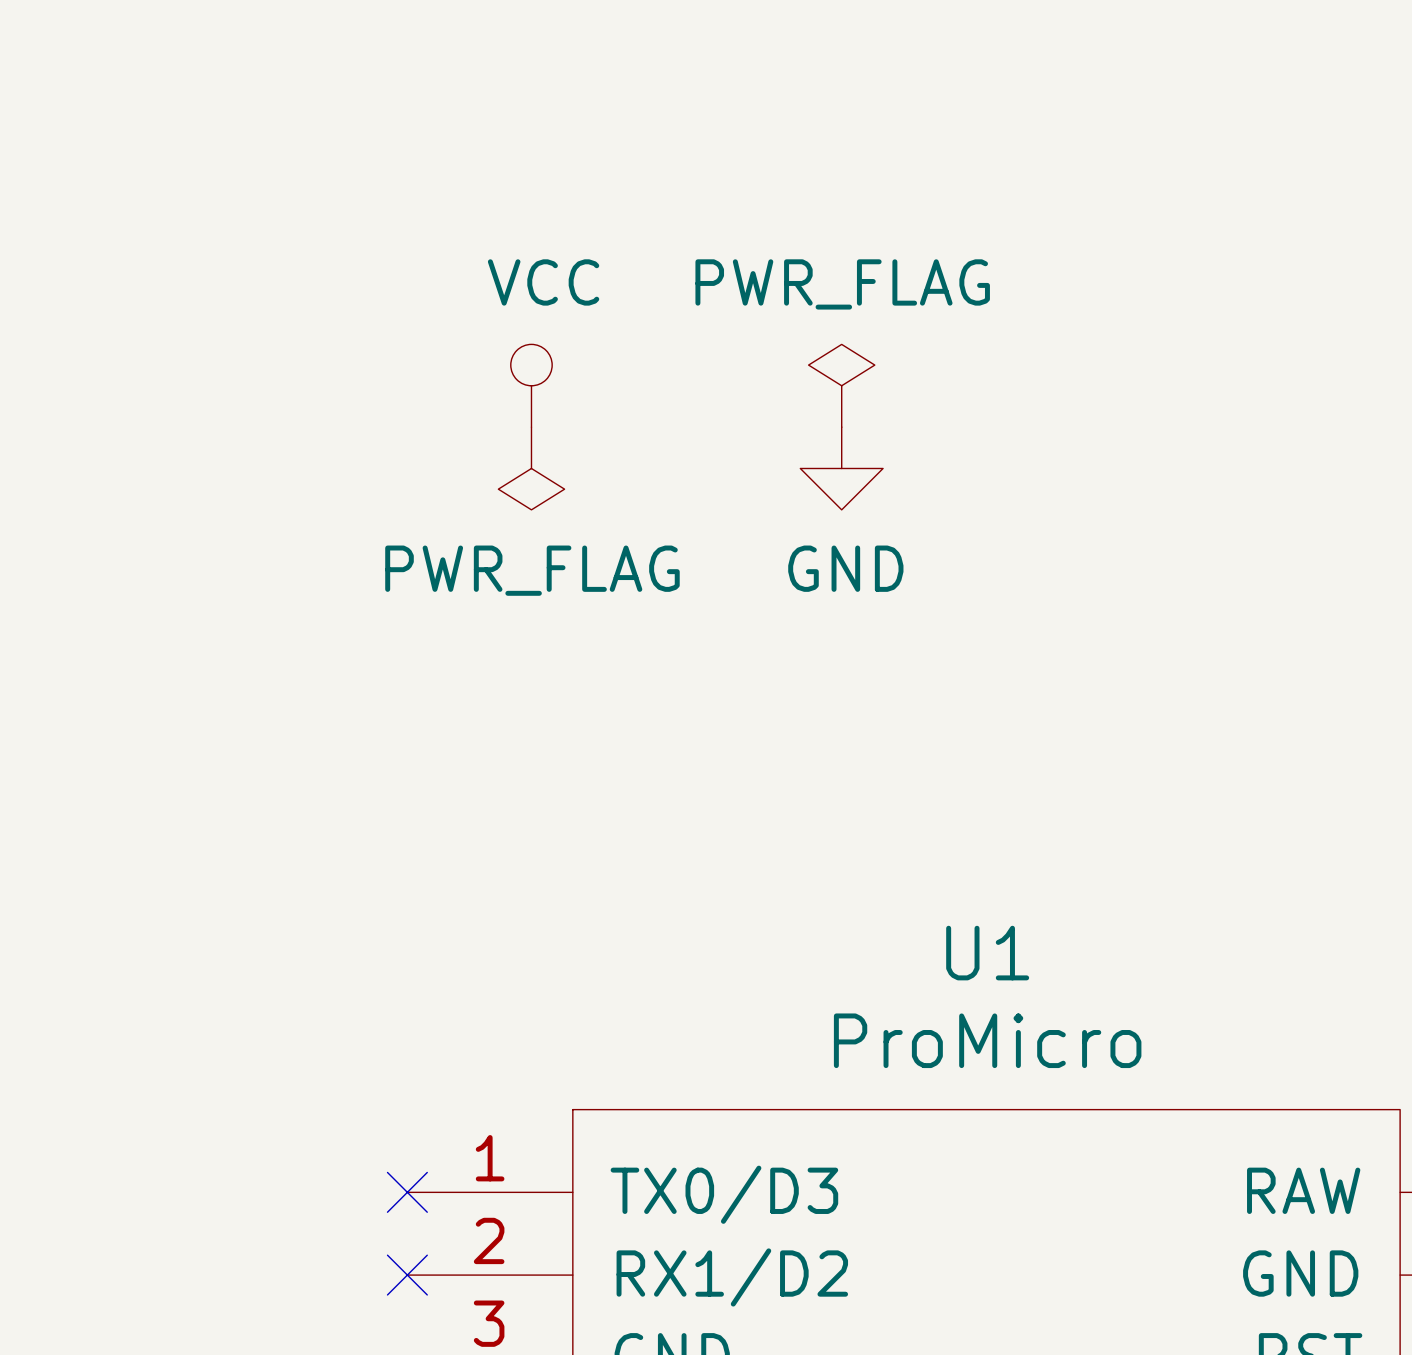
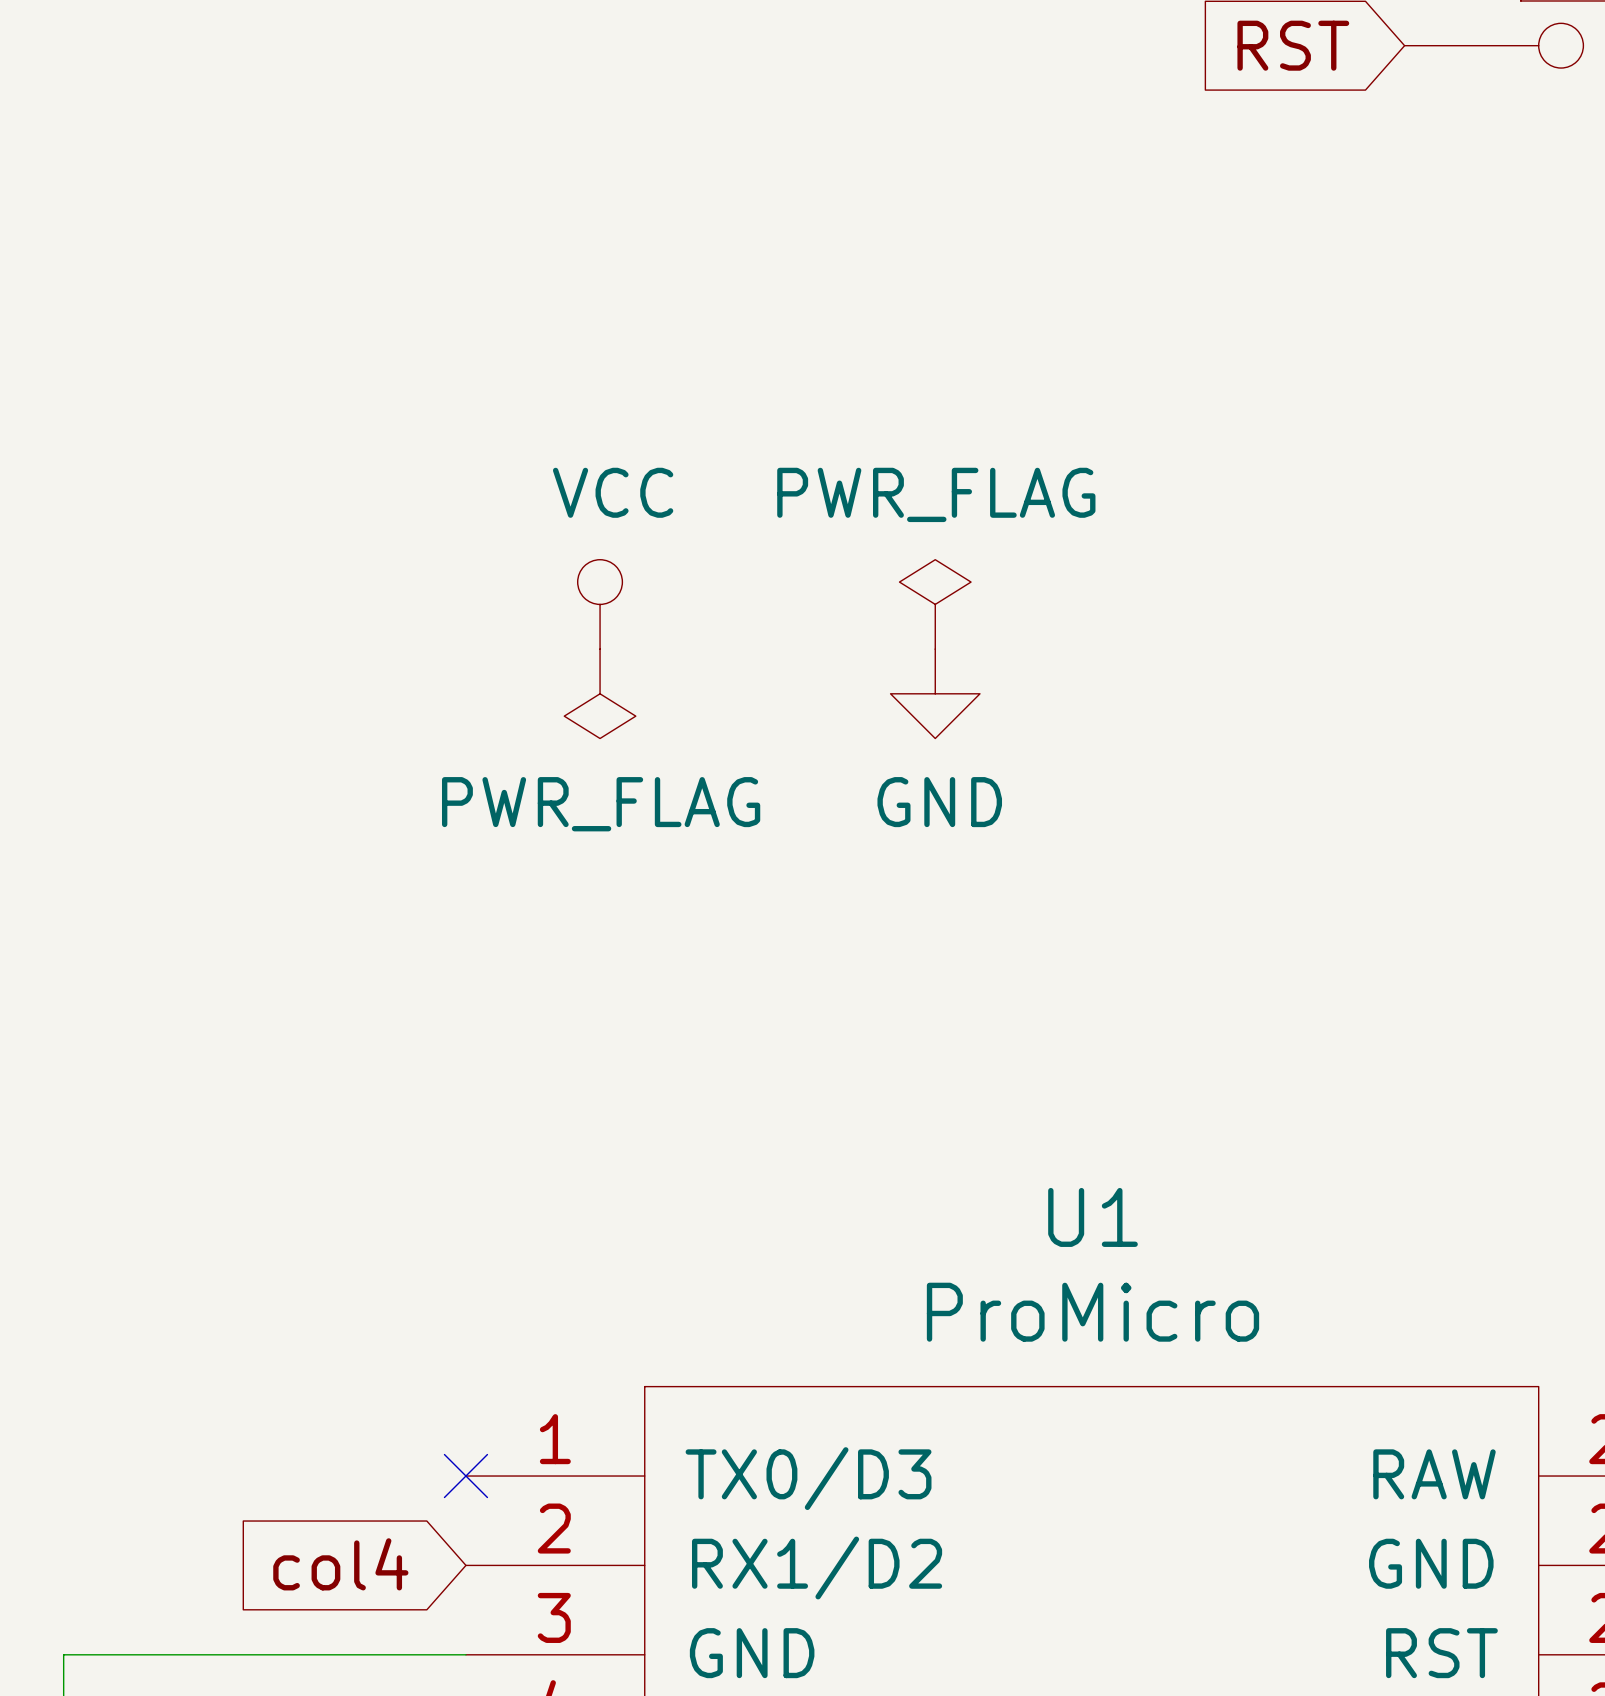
global label: none -> col4 (340, 1564)
no-connect mark: (407, 1275) -> none

